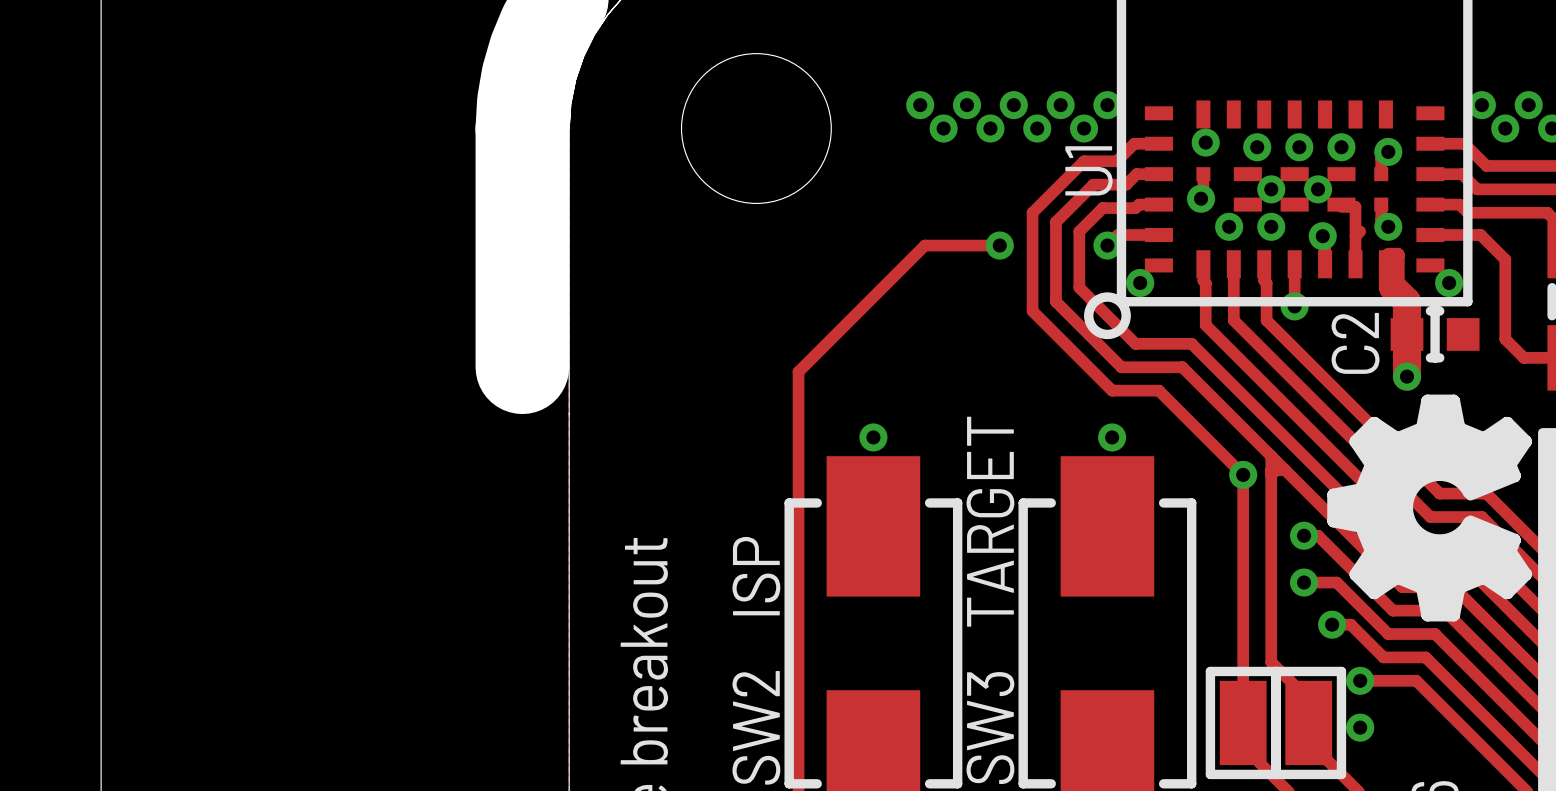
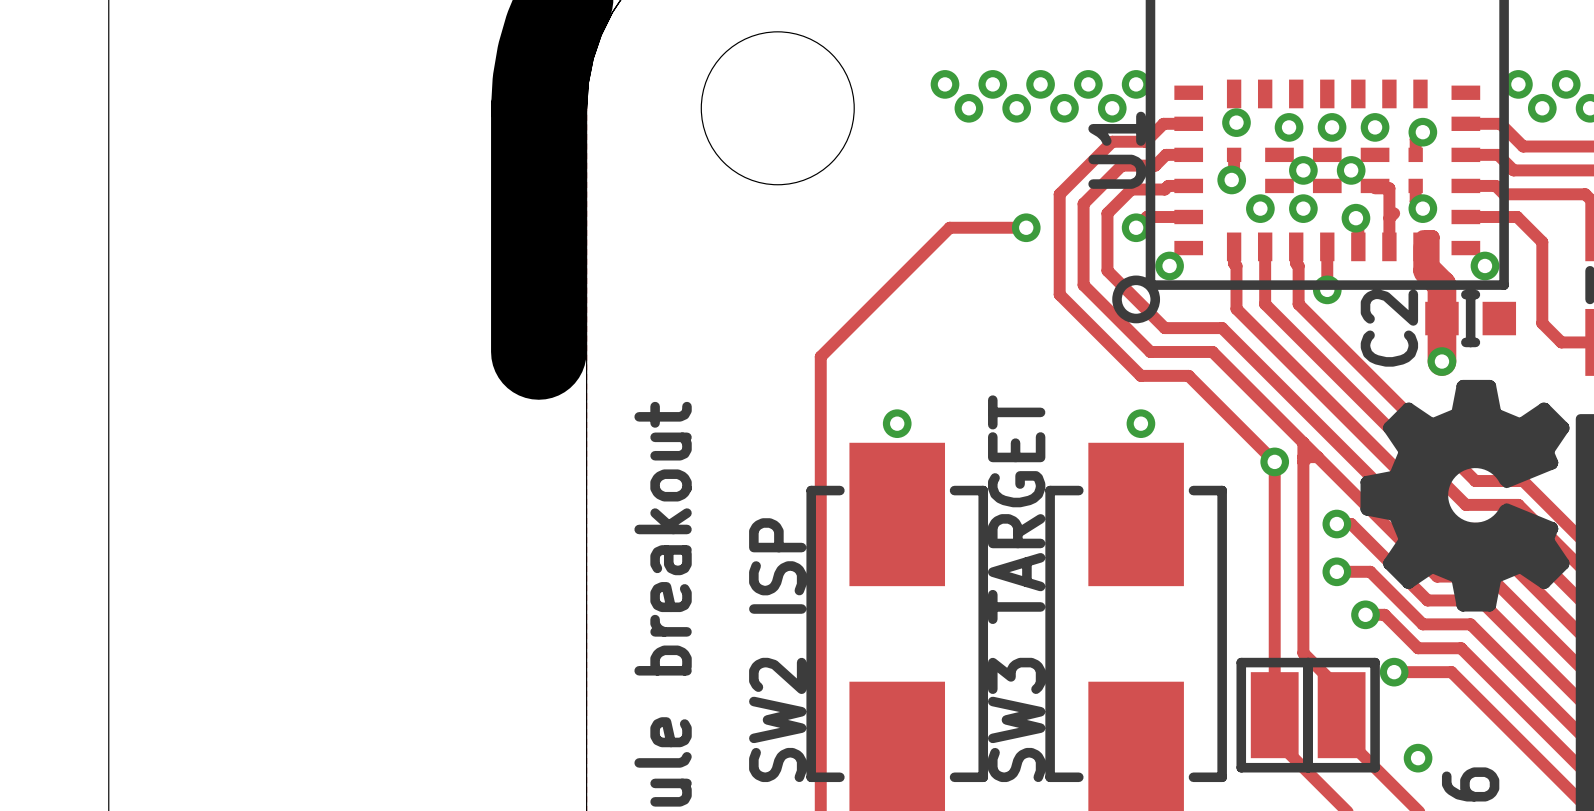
via position: (1360, 727) -> (1418, 758)

